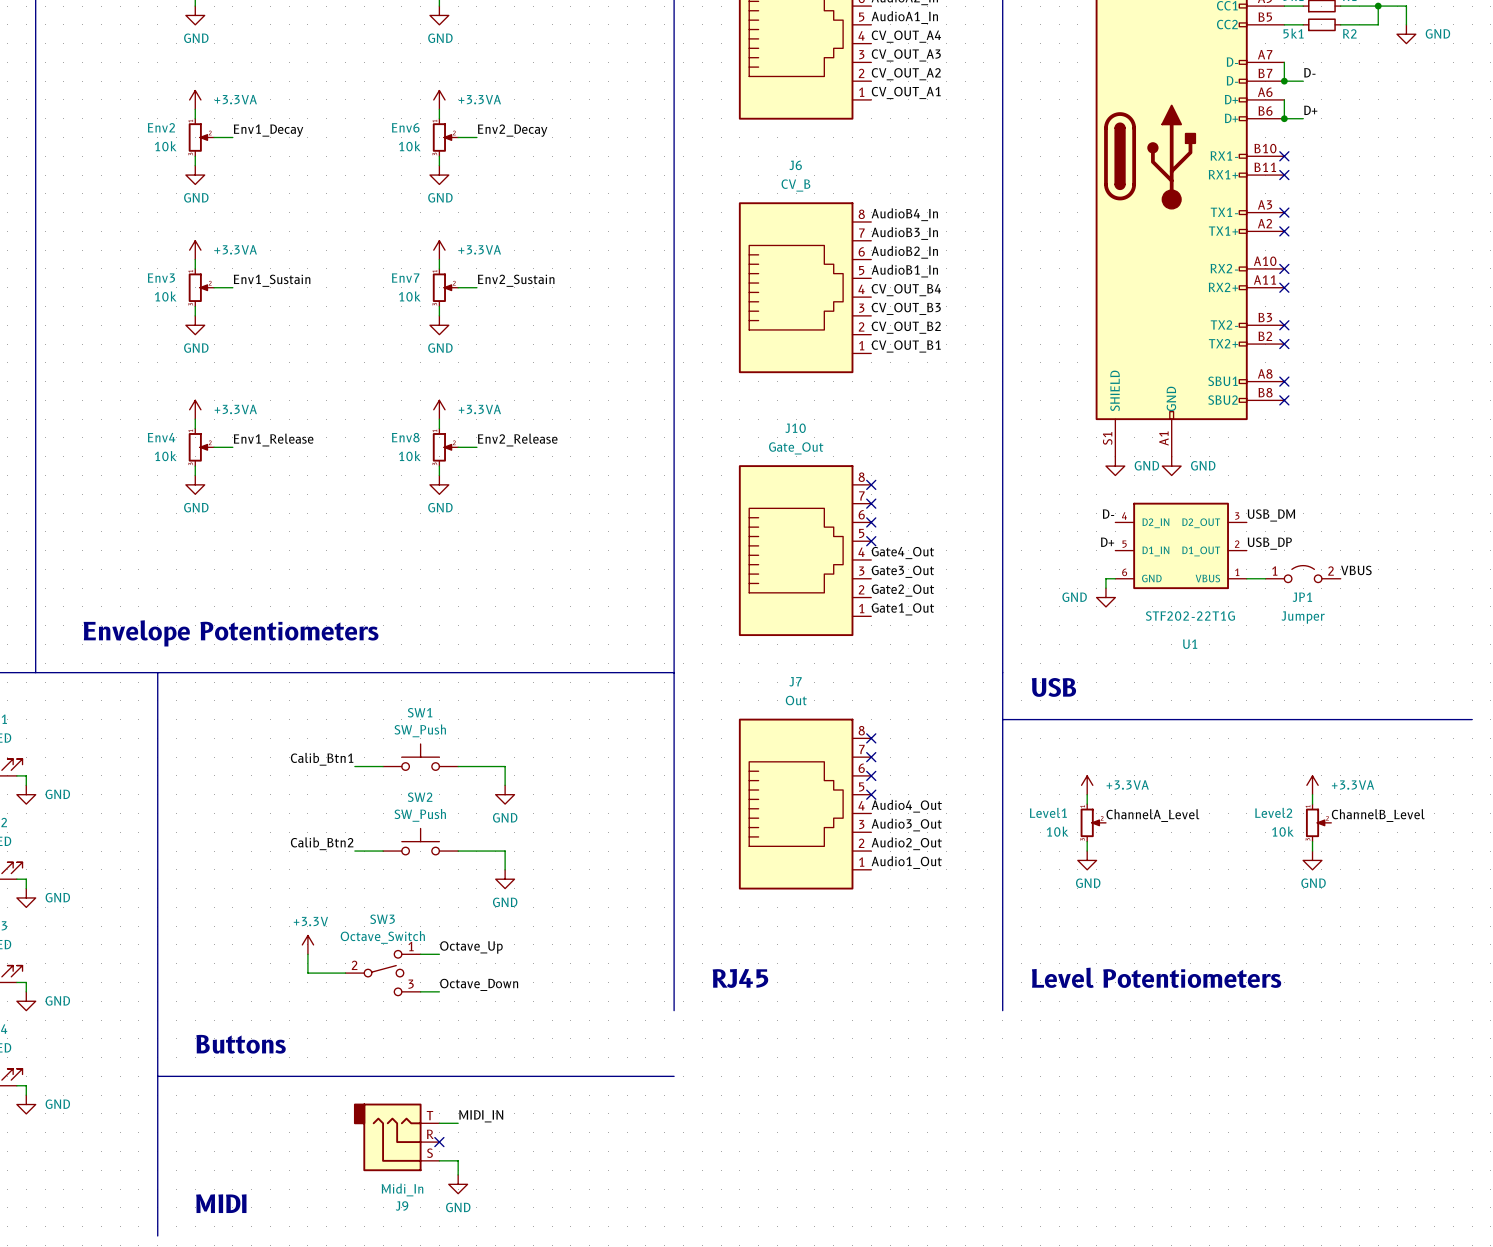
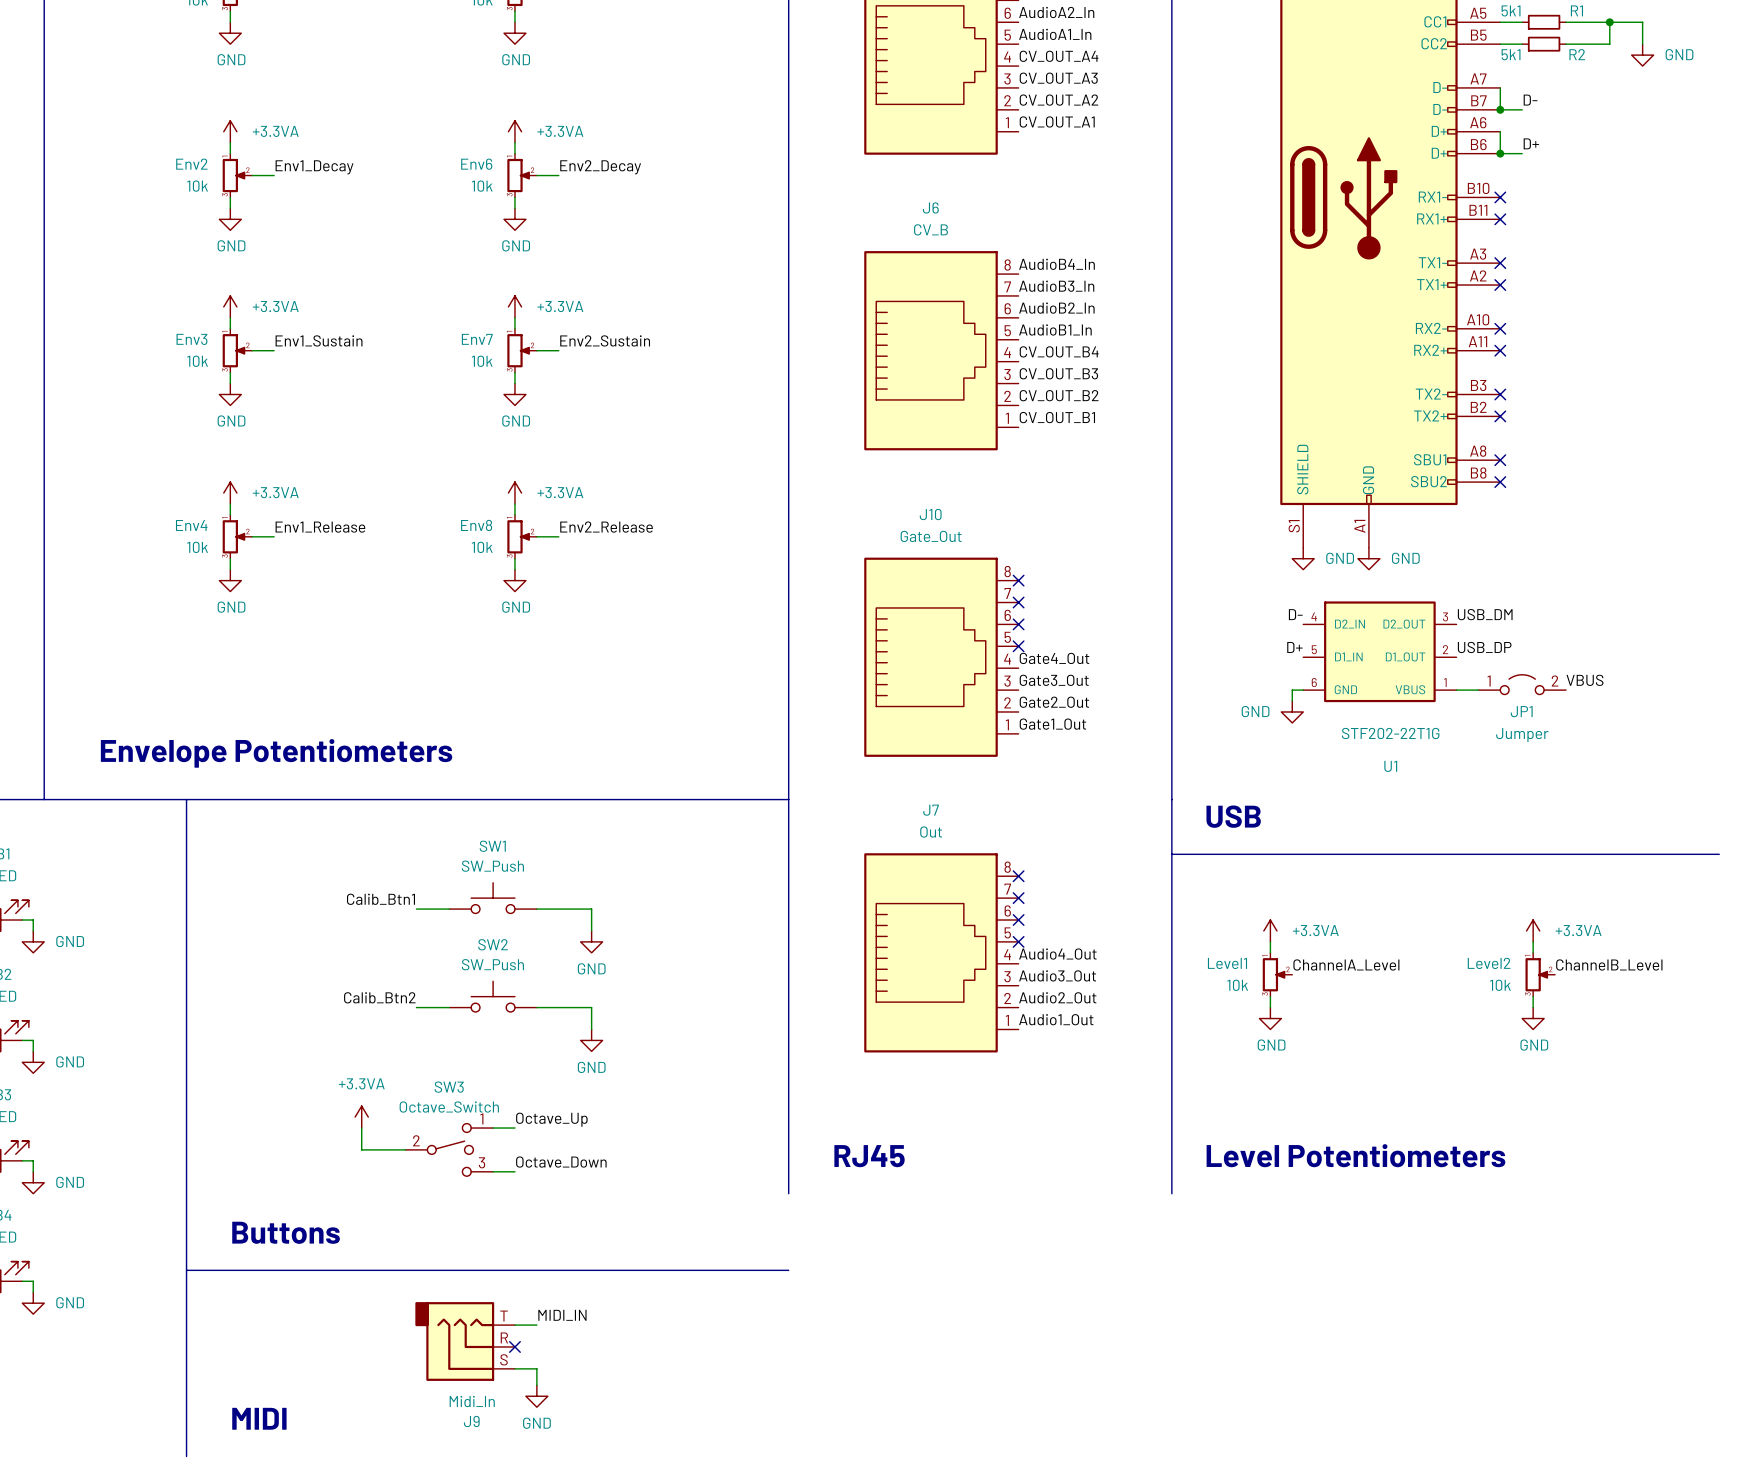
power symbol: +3.3V (307, 944) -> +3.3VA (361, 1117)

